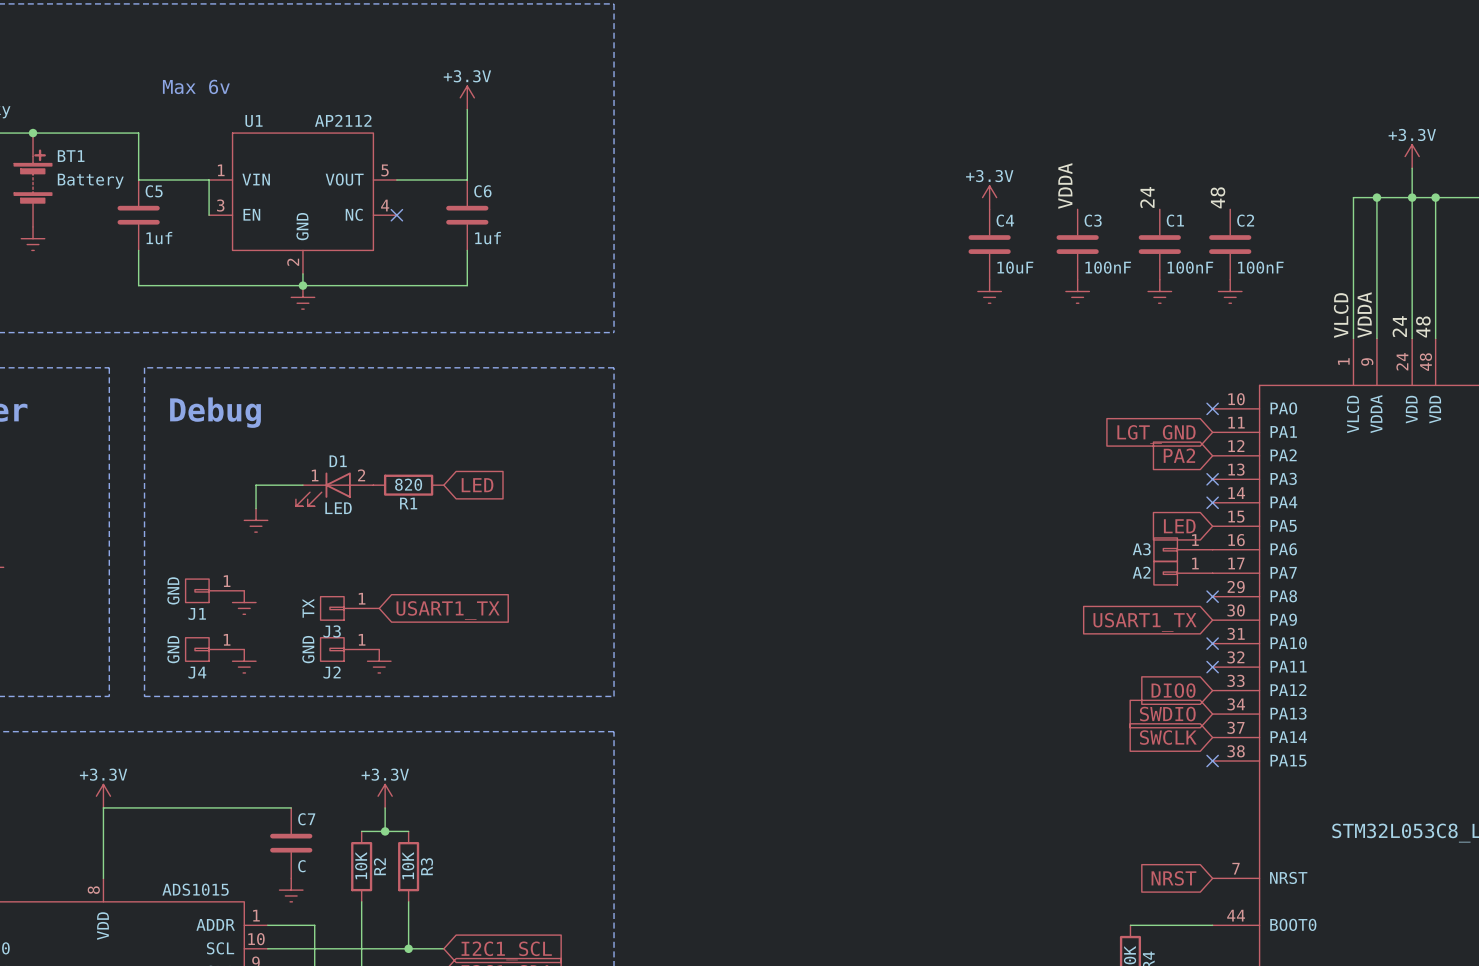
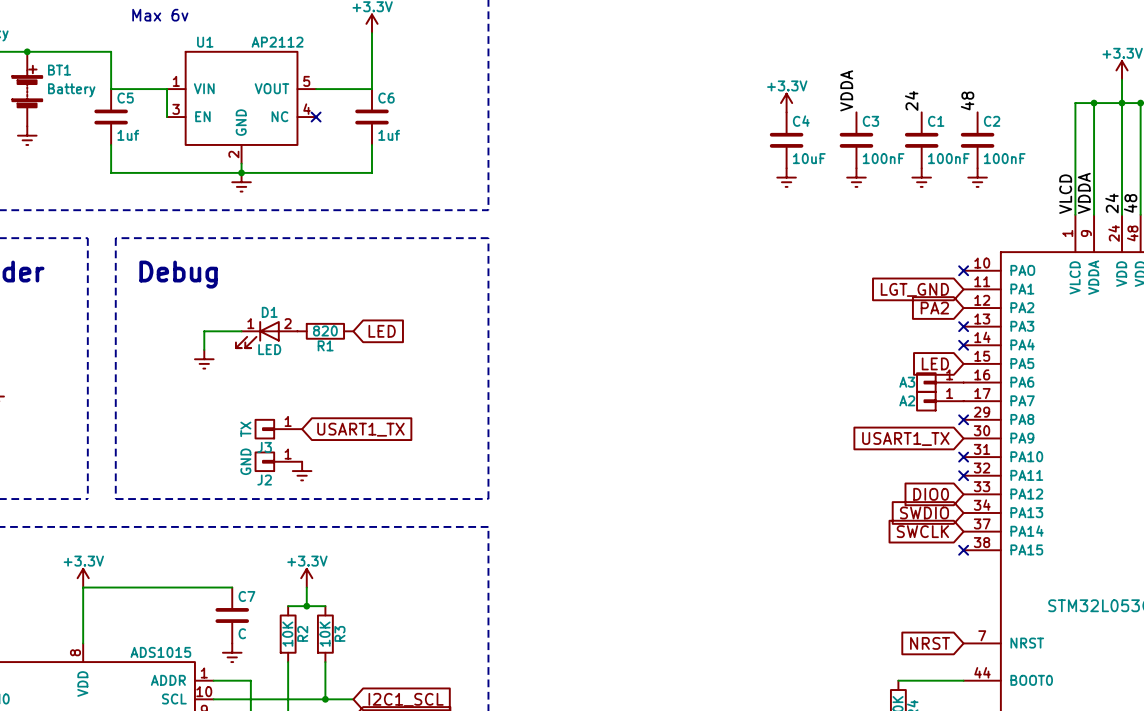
J1: GND (214, 590) -> none
power symbol: (244, 602) -> none
J4: GND (214, 649) -> none
power symbol: (244, 661) -> none

